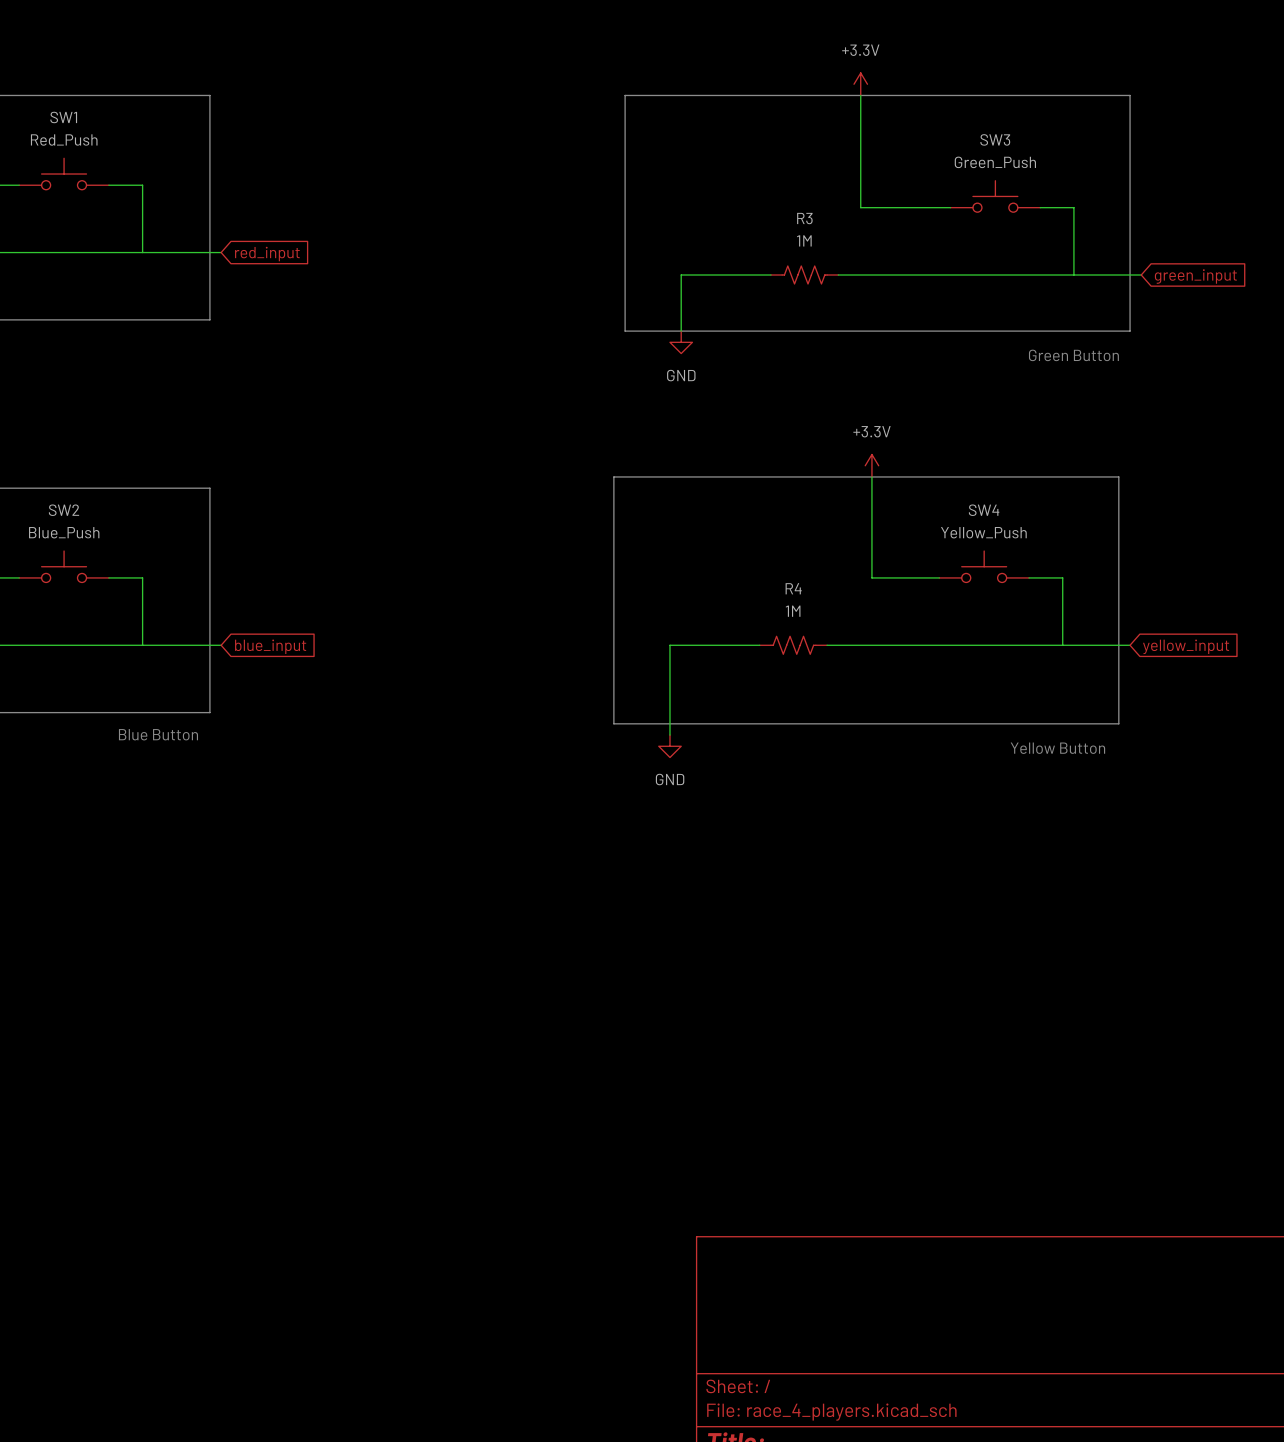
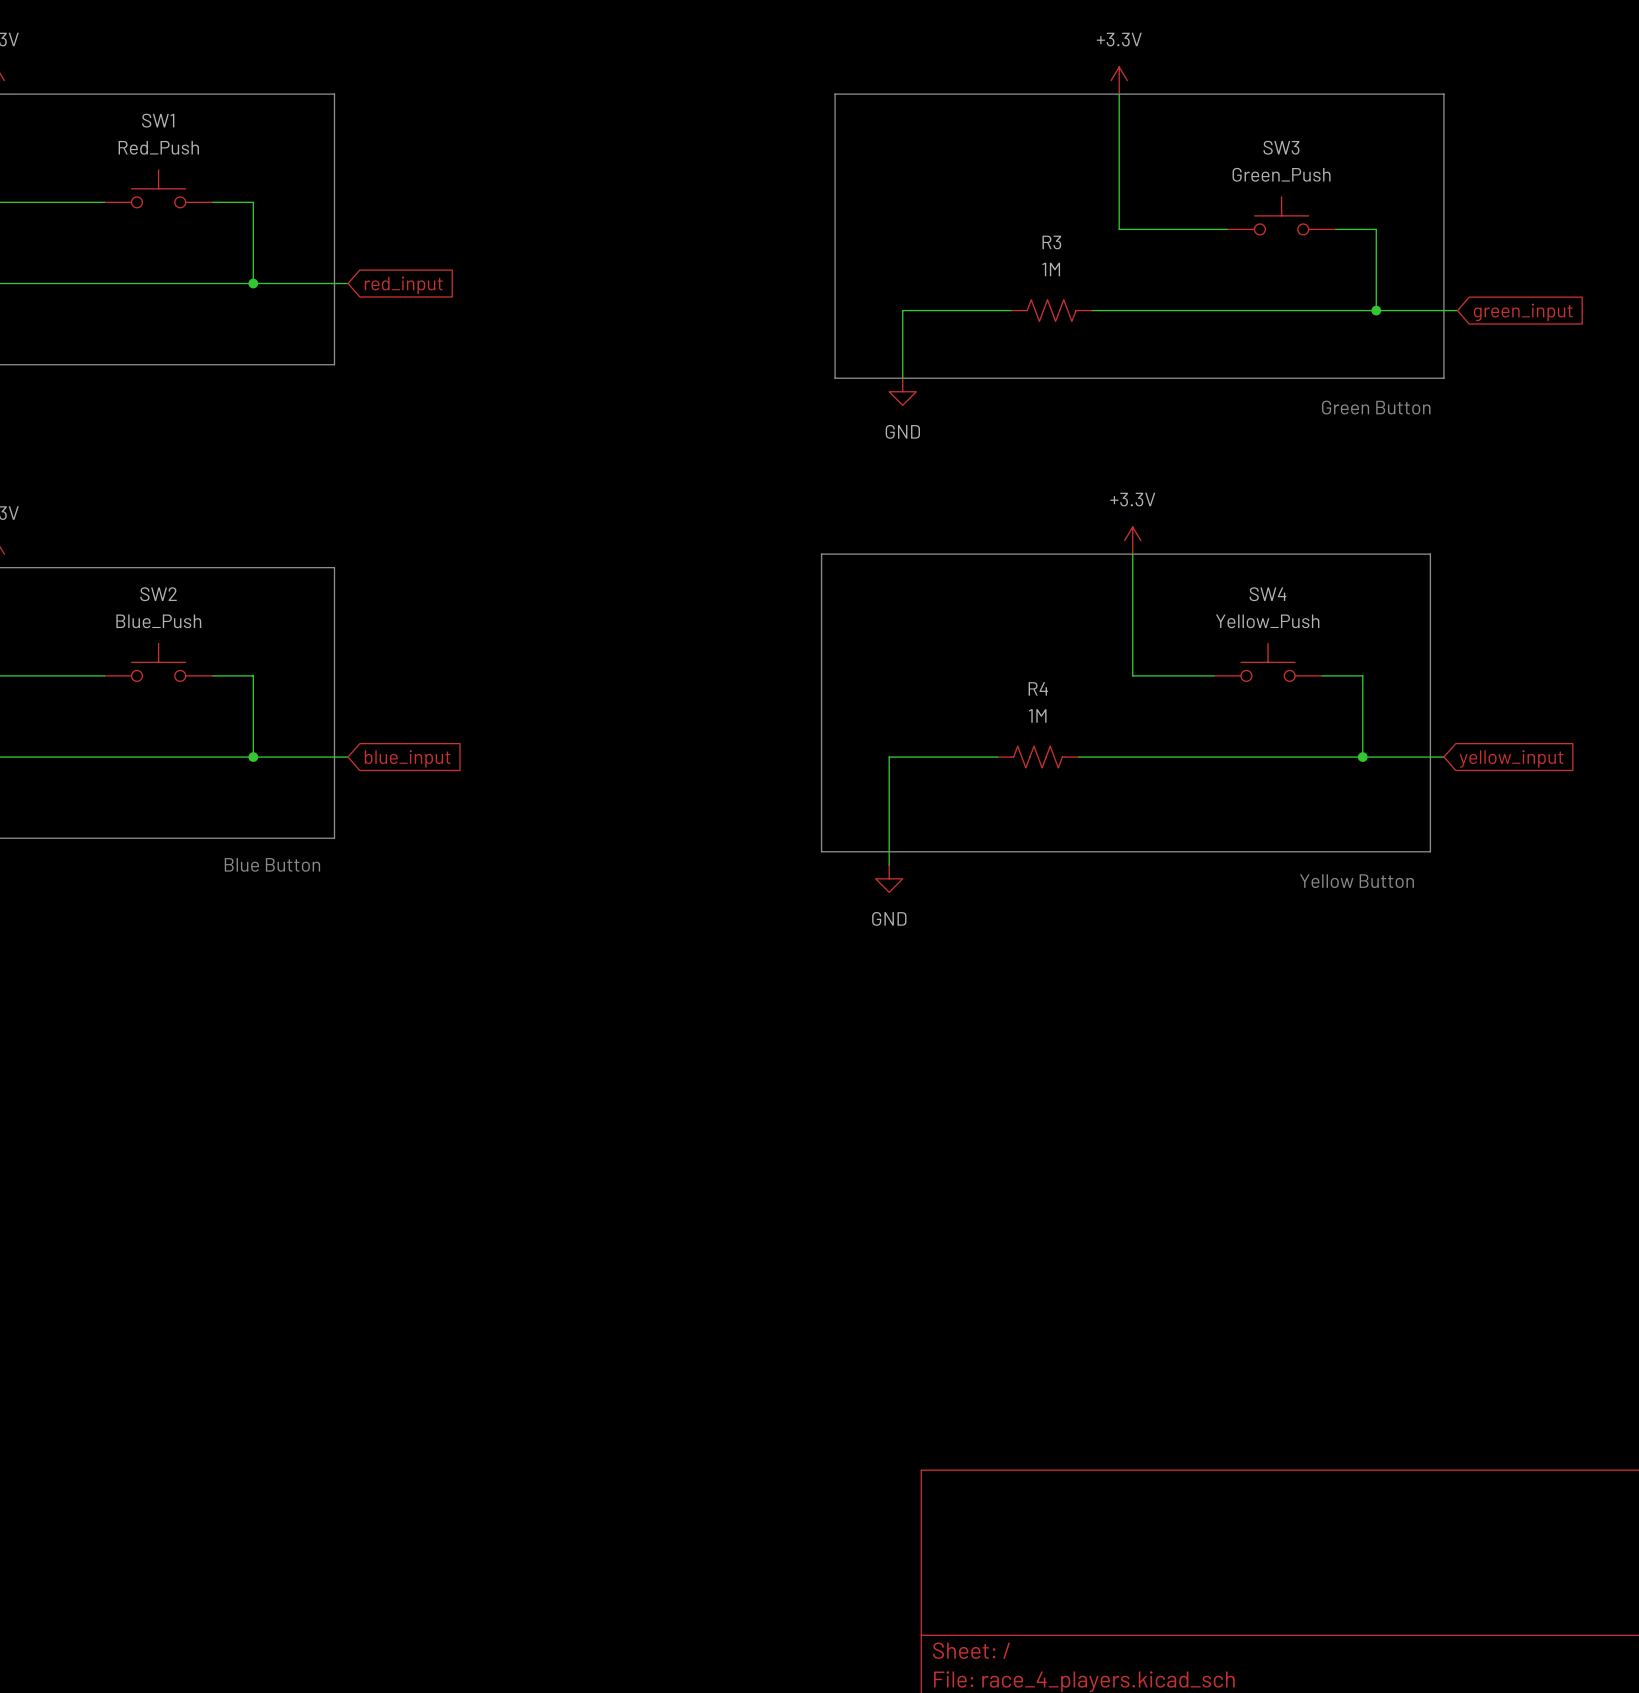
junction: none -> (253, 283)
junction: none -> (1376, 310)
junction: none -> (253, 757)
junction: none -> (1362, 757)

